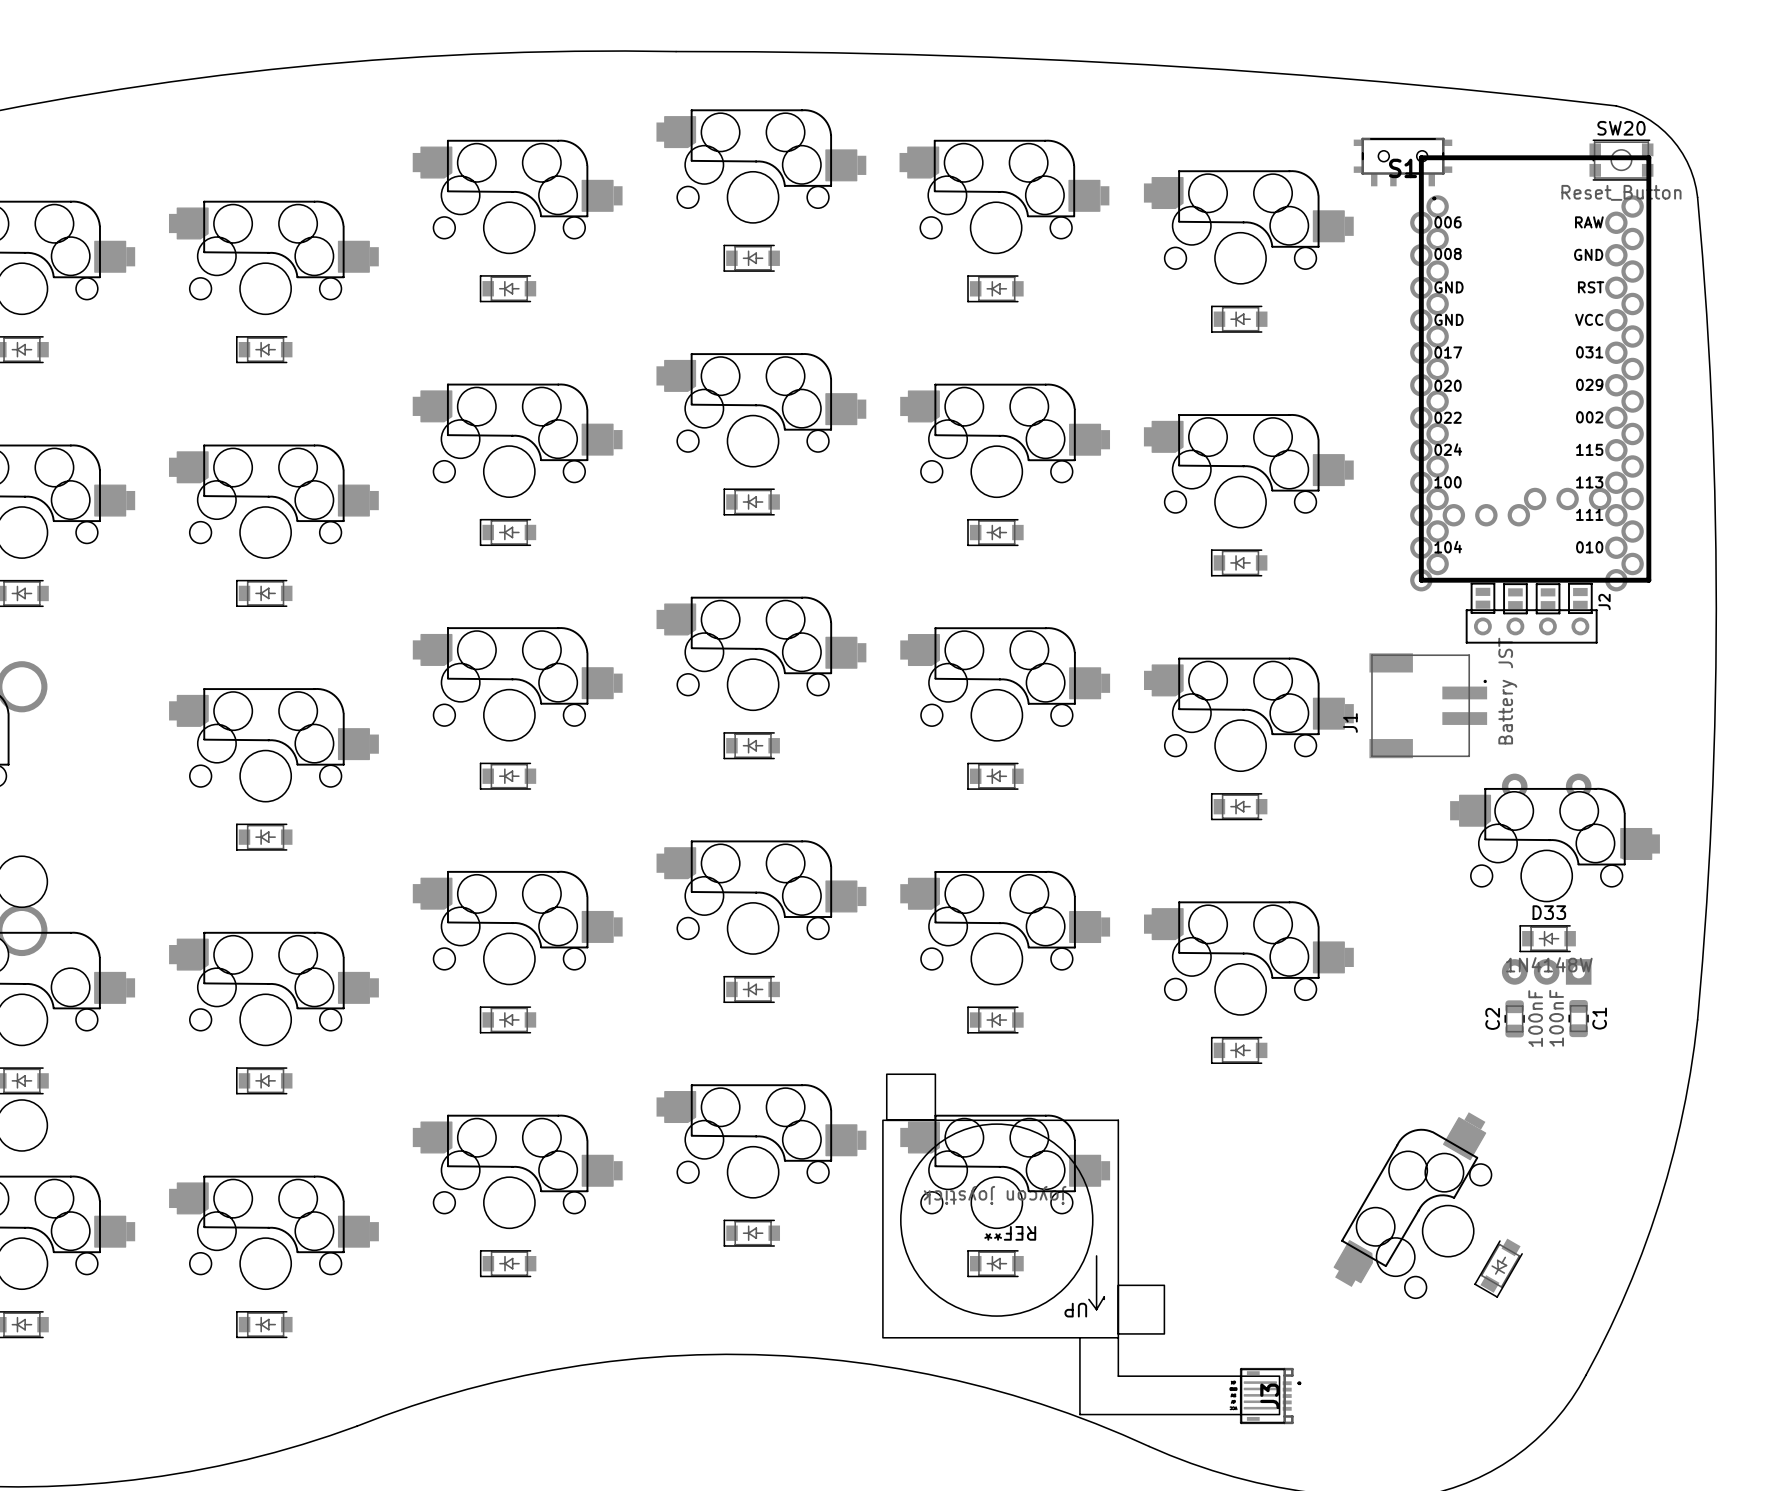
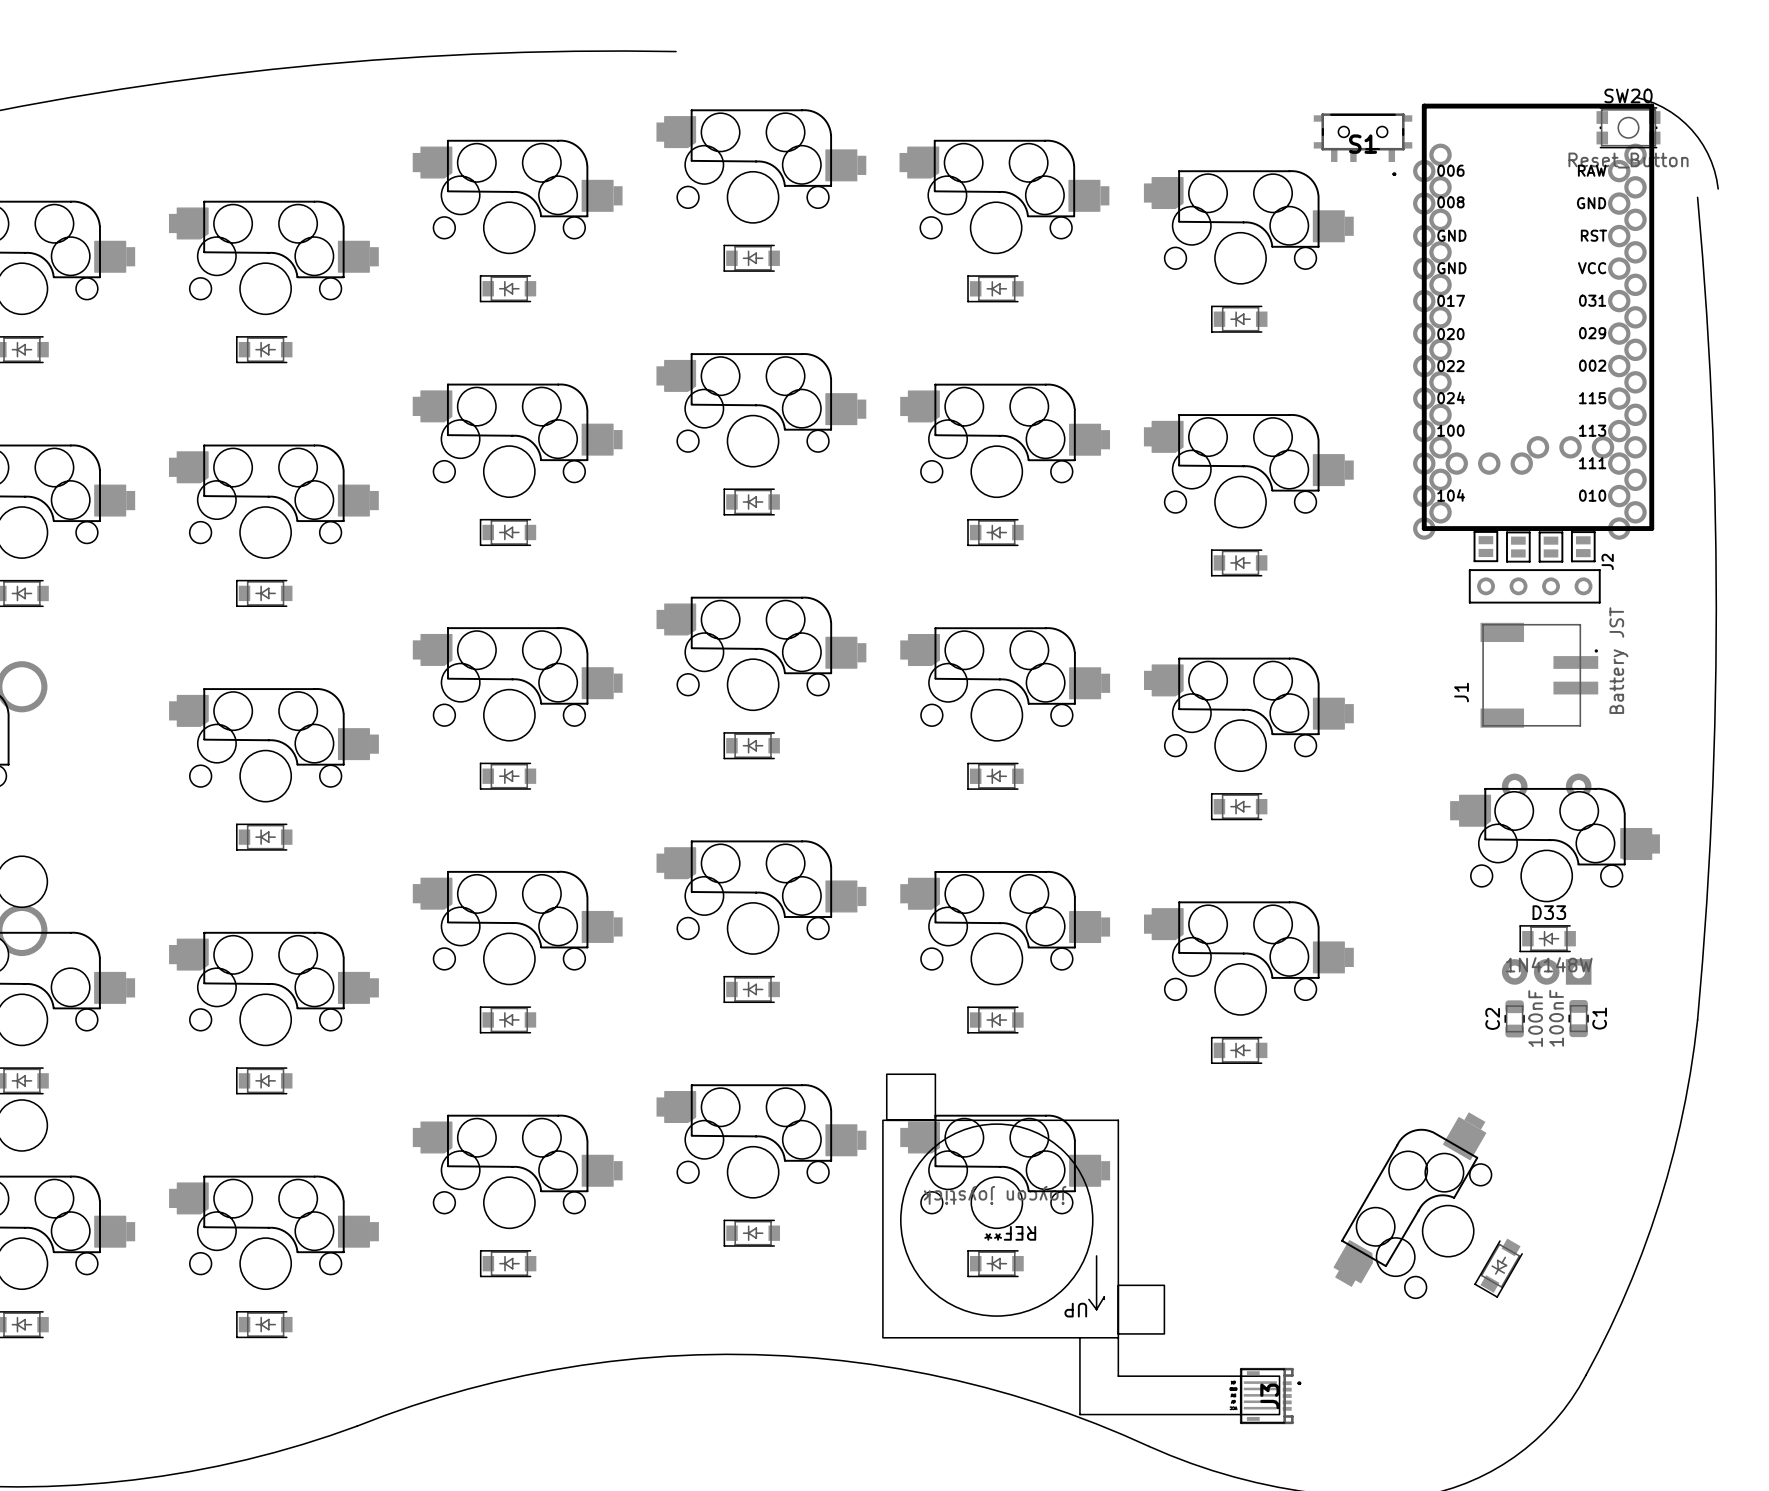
board edge: (676, 51) (911, 54) (1147, 64) (1381, 81) (1616, 105) (1642, 115) (1658, 125) (1671, 138) (1682, 153) (1690, 170) (1697, 197) -> none
board edge: none -> (1636, 97) (1654, 103) (1671, 112) (1692, 130) (1703, 145) (1711, 161) (1718, 188)
SW20 position: (1621, 160) -> (1628, 127)
S1 position: (1403, 169) -> (1363, 144)
part position: (1530, 373) -> (1533, 321)
part: none -> (1485, 546)
part: none -> (1583, 546)
part: none -> (1518, 547)
part: none -> (1550, 547)
part: (1482, 598) -> none
part: (1515, 598) -> none
part: (1548, 598) -> none
part: (1580, 598) -> none
J2 position: (1531, 626) -> (1534, 586)
J1 position: (1428, 705) -> (1539, 675)

